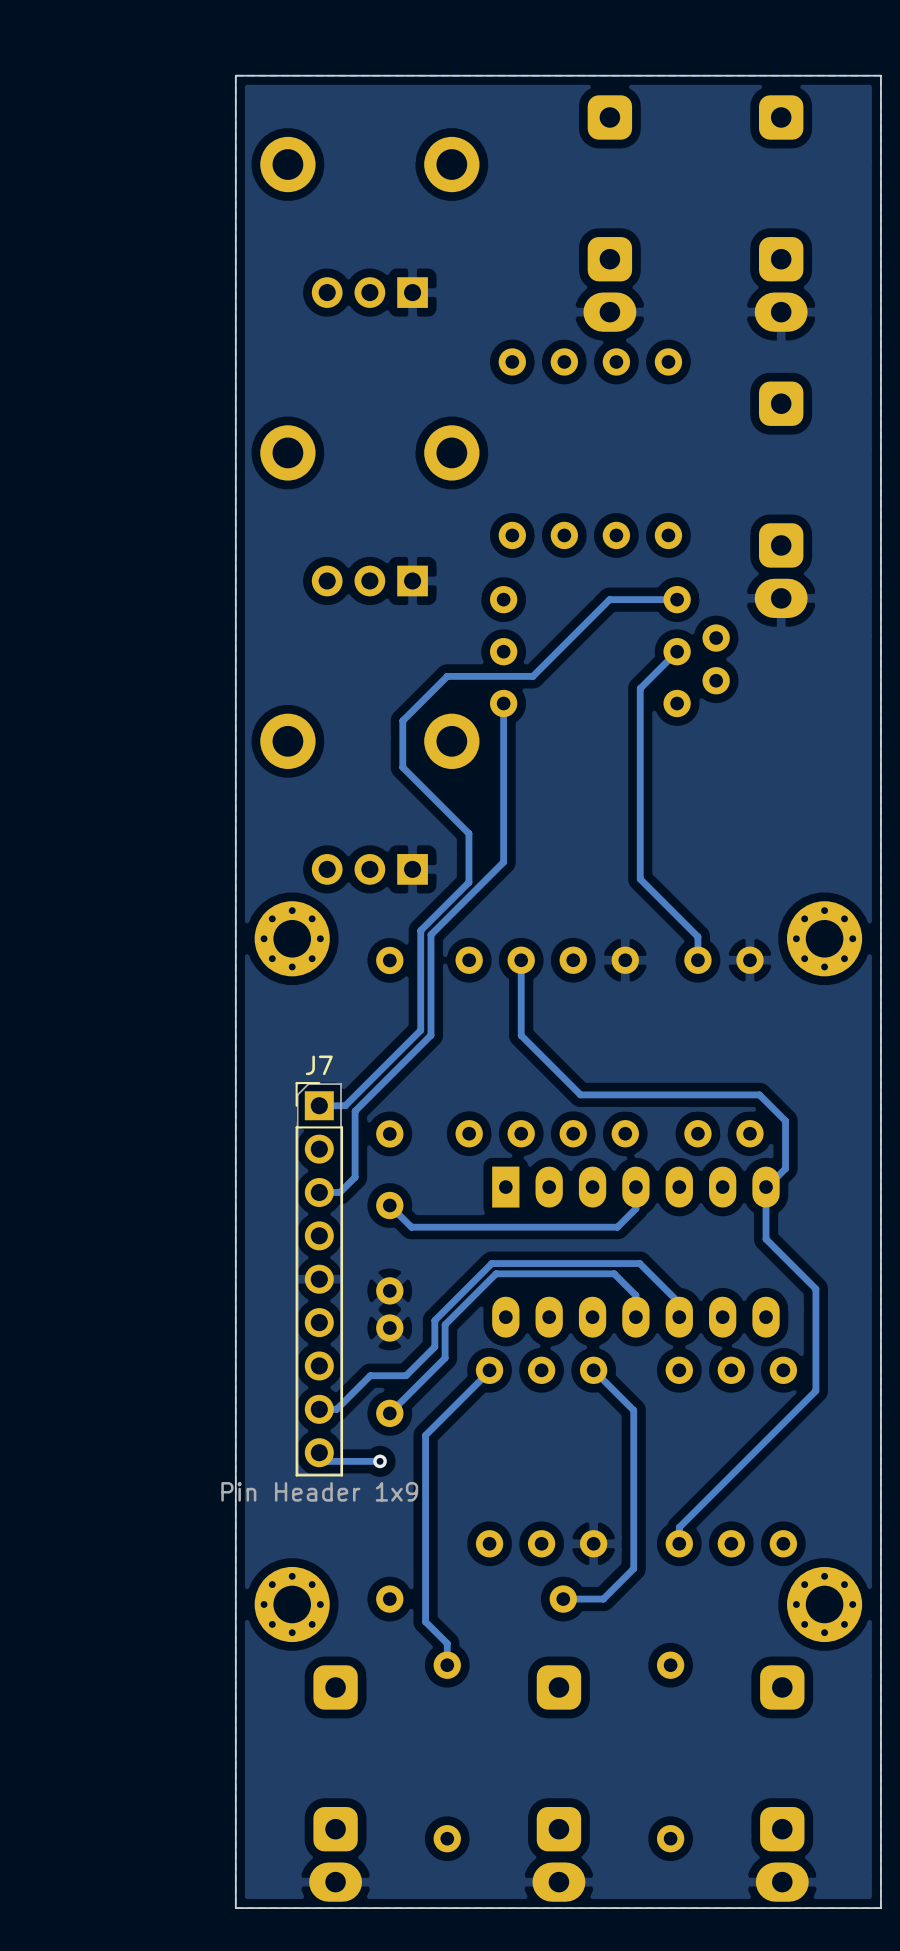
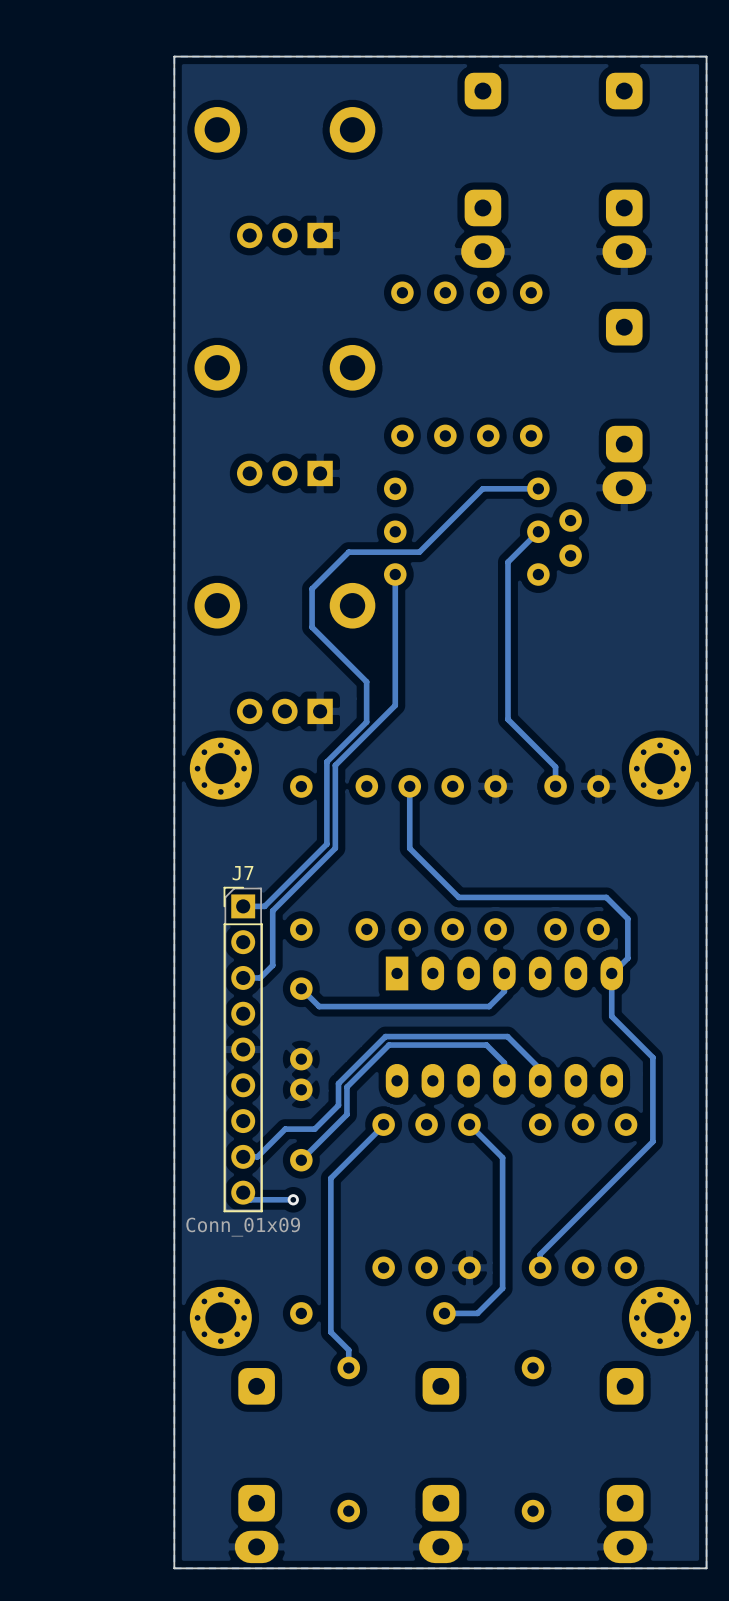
J7 value: Pin Header 1x9 (319, 1491) -> Conn_01x09 (243, 1227)

